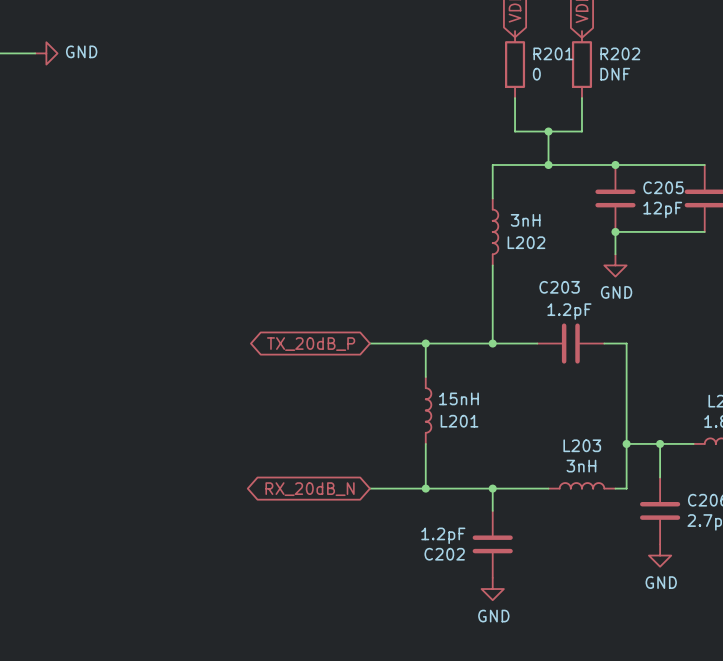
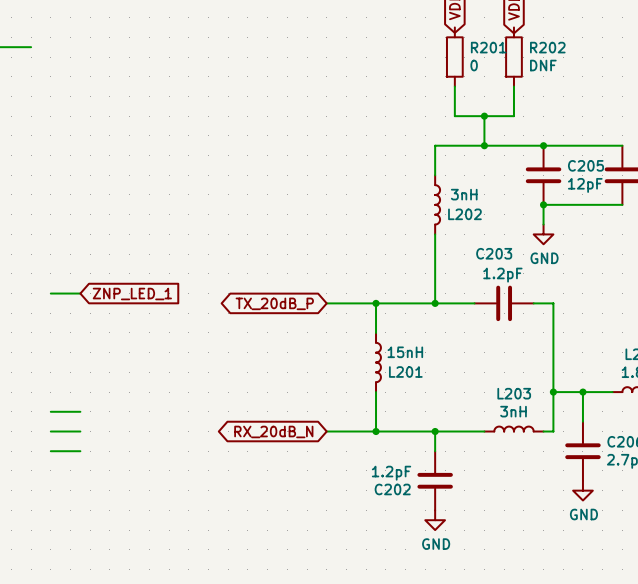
power symbol: GND (46, 53) -> none
wire: none -> (50, 293) (80, 293)
global label: none -> ZNP_LED_1 (132, 294)
wire: none -> (50, 411) (80, 411)
wire: none -> (50, 431) (80, 431)
wire: none -> (50, 451) (80, 451)

